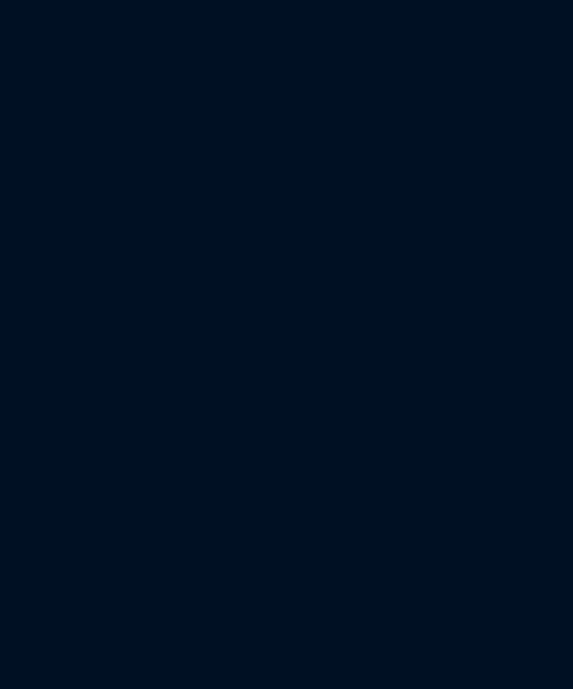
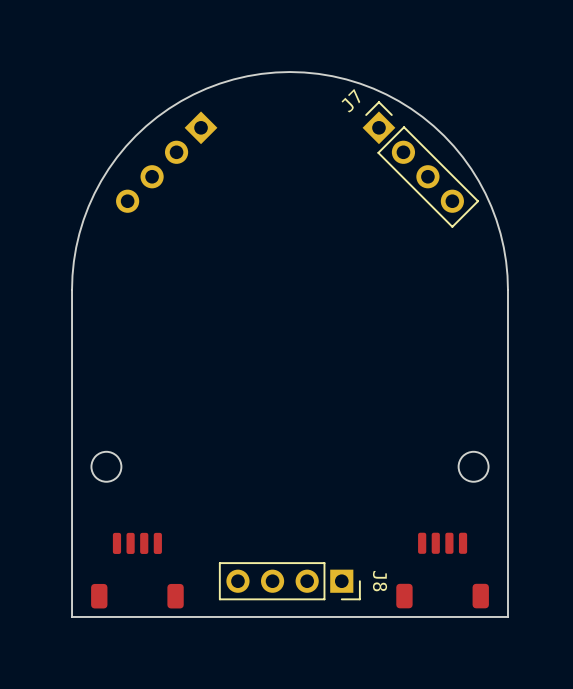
part: none -> (166, 162)
J7: none -> (420, 164)
part: none -> (290, 344)
part: none -> (137, 570)
part: none -> (442, 570)
J8: none -> (289, 581)

